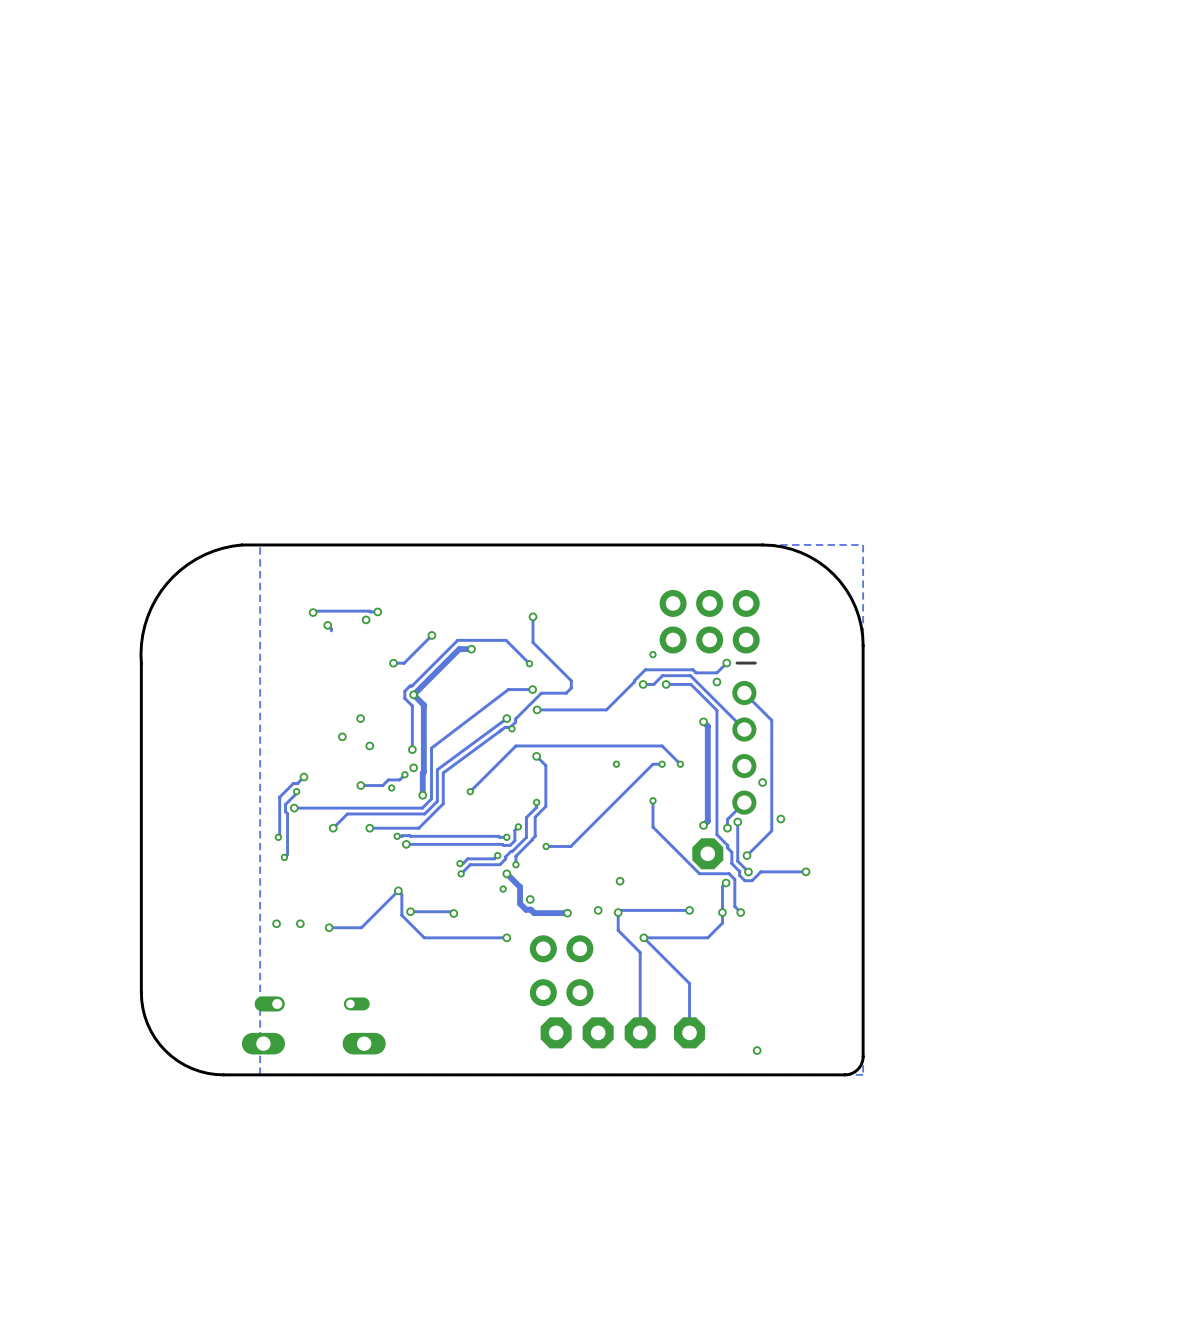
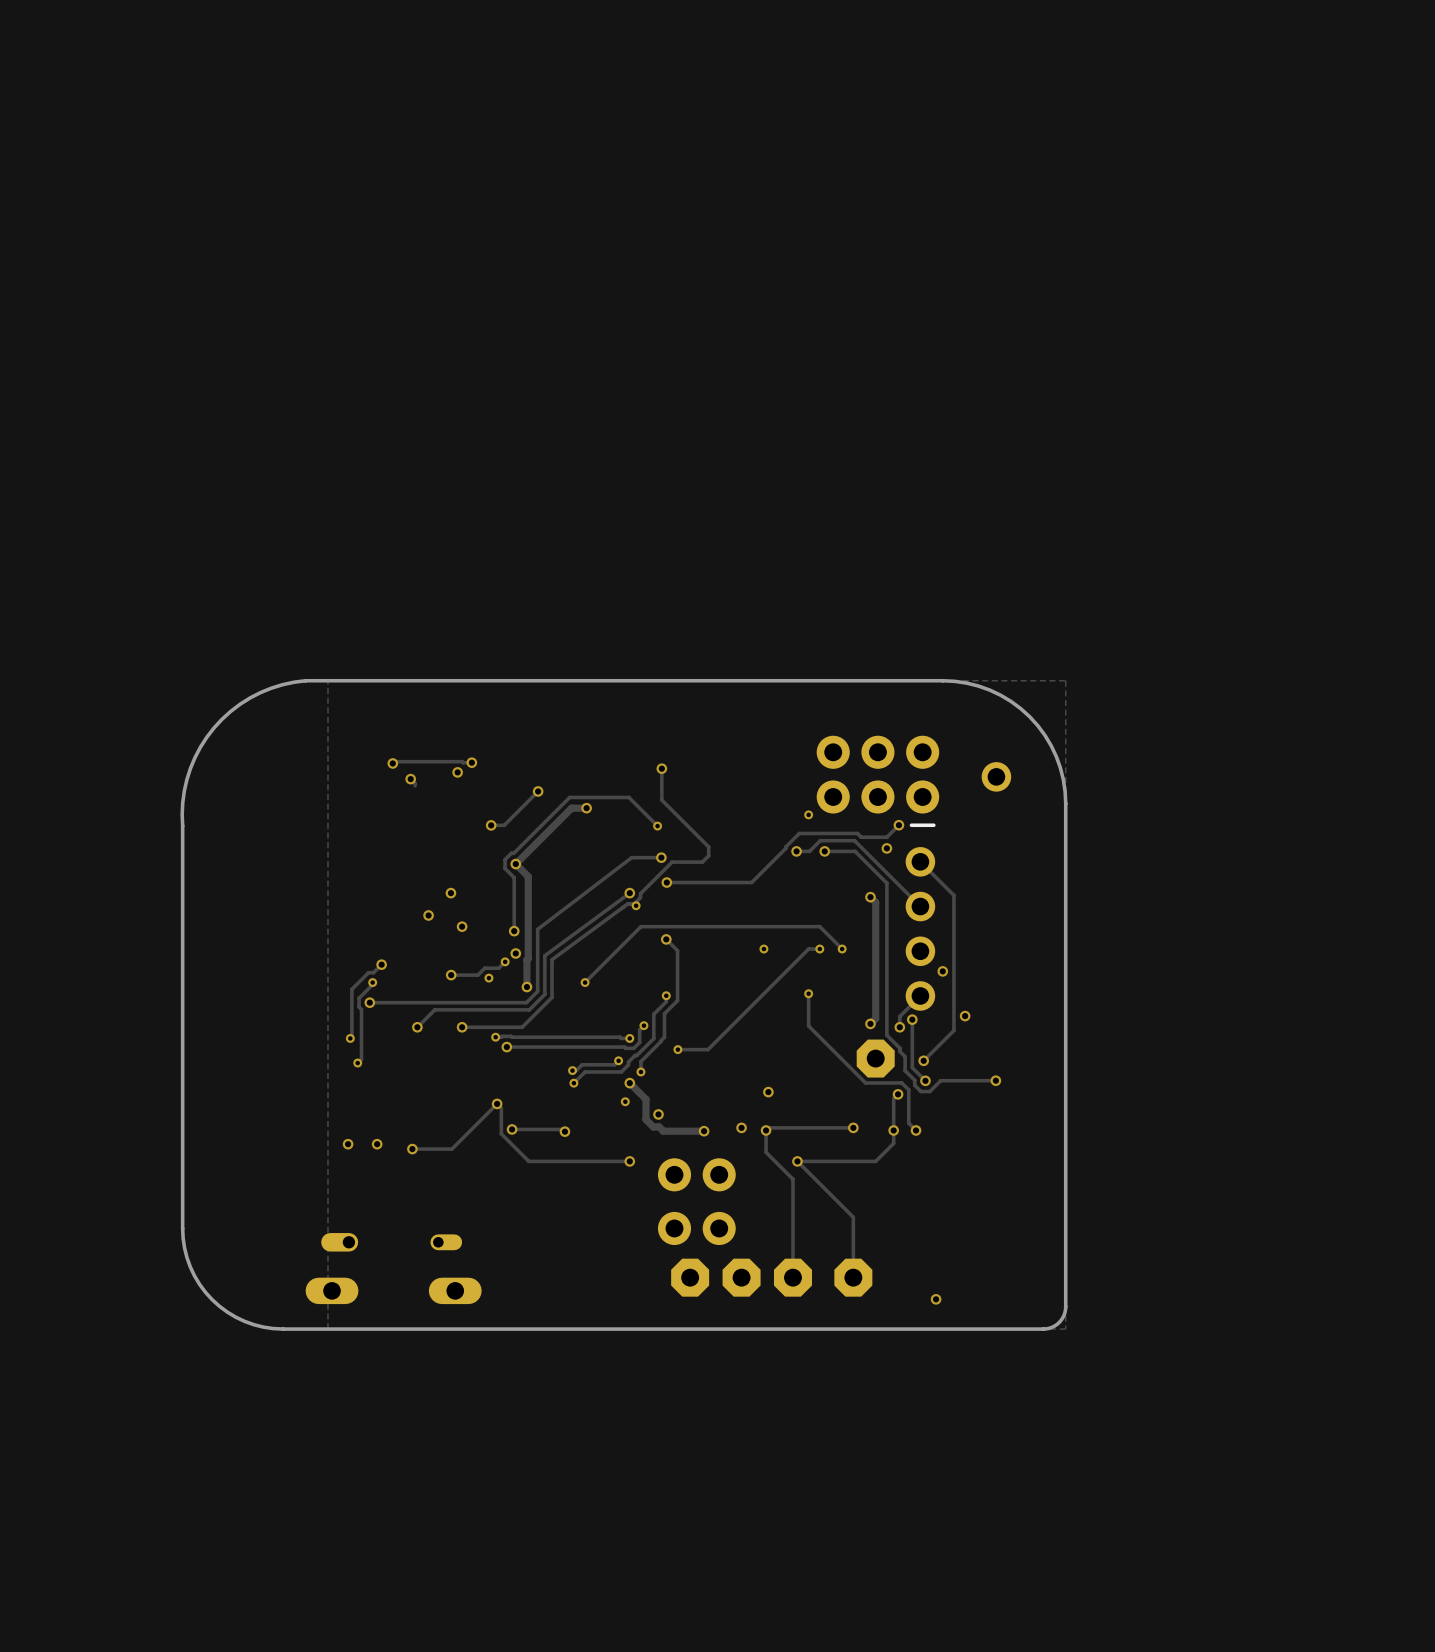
part: none -> (996, 776)

